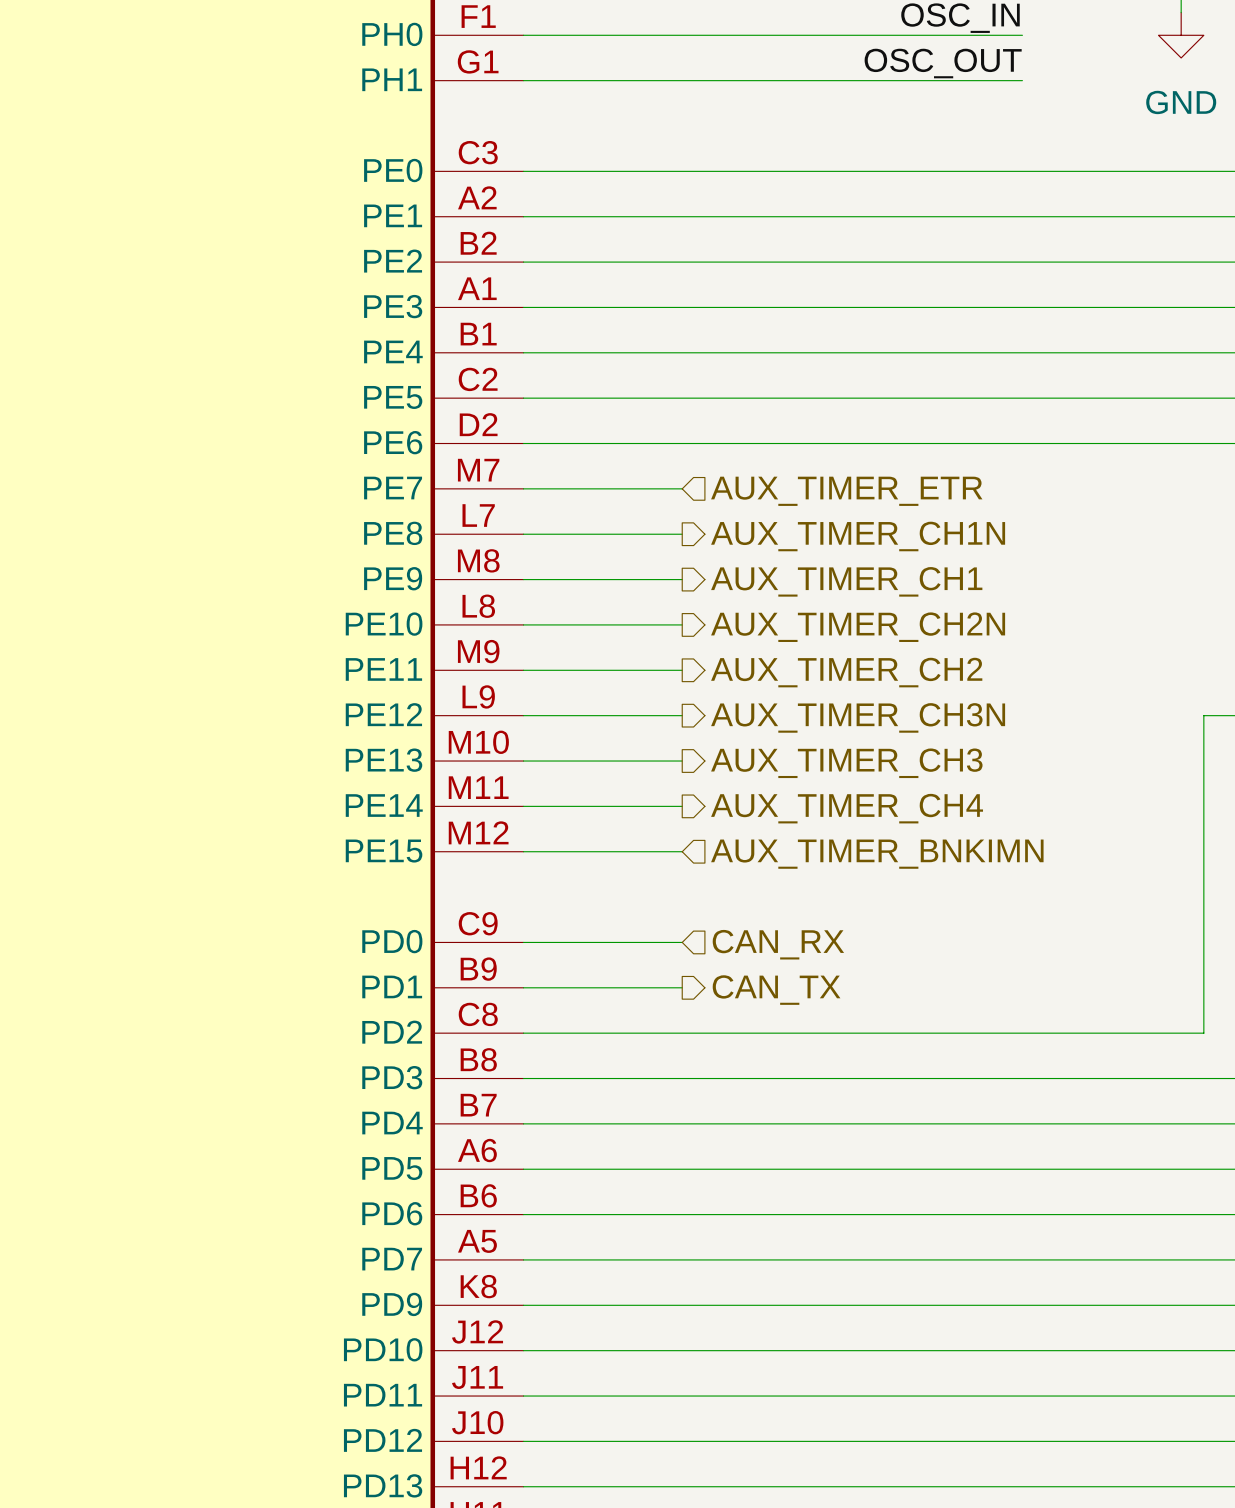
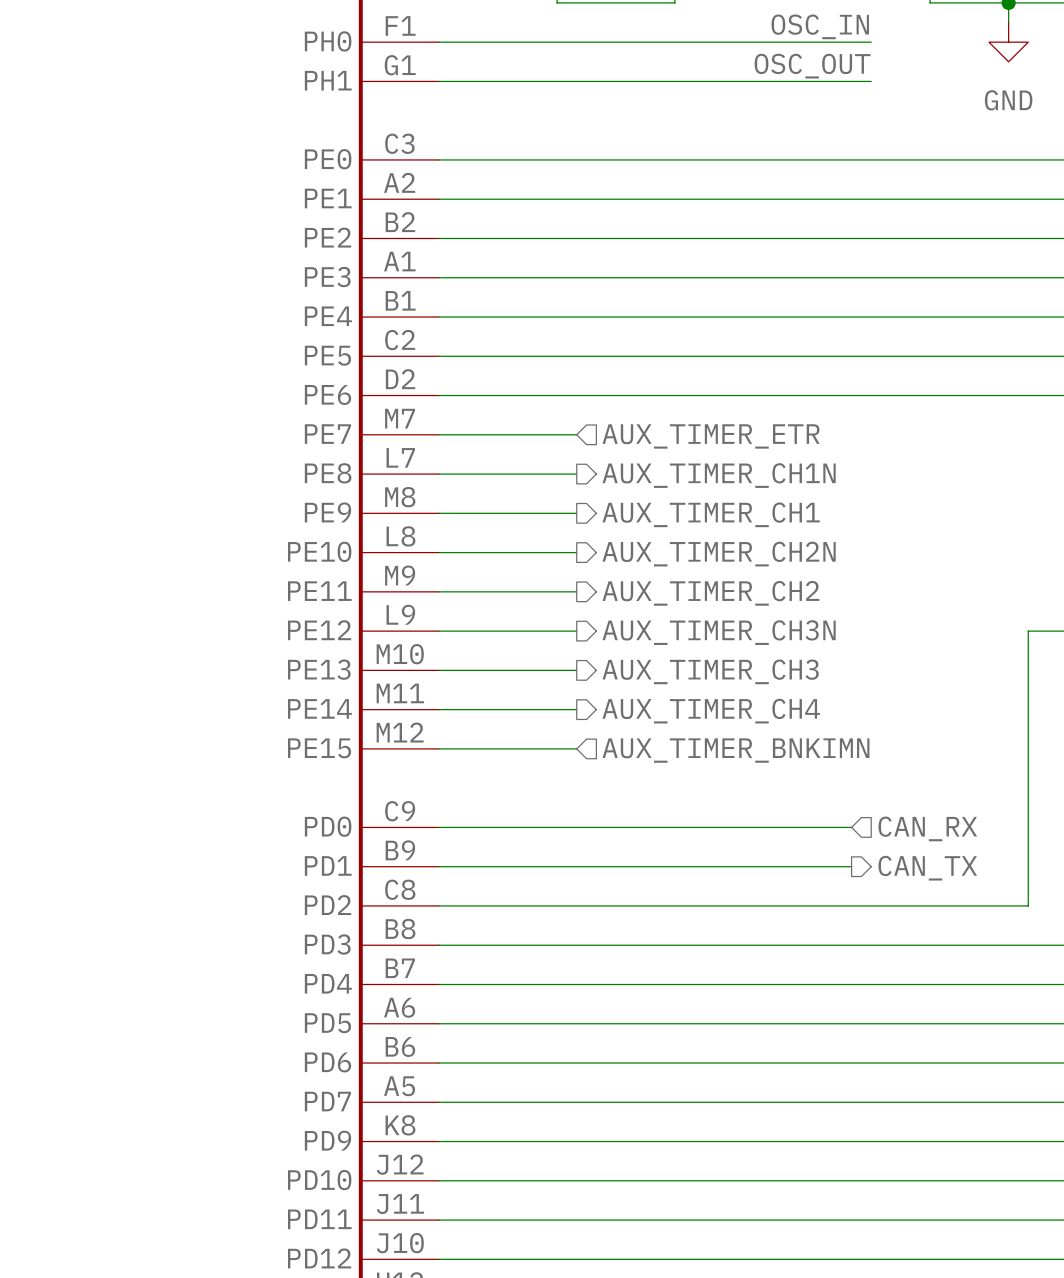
wire: none -> (576, 827) (851, 827)
hierarchical label position: CAN_RX (778, 944) -> CAN_RX (927, 828)
wire: none -> (576, 866) (851, 866)
hierarchical label position: CAN_TX (776, 990) -> CAN_TX (927, 868)

